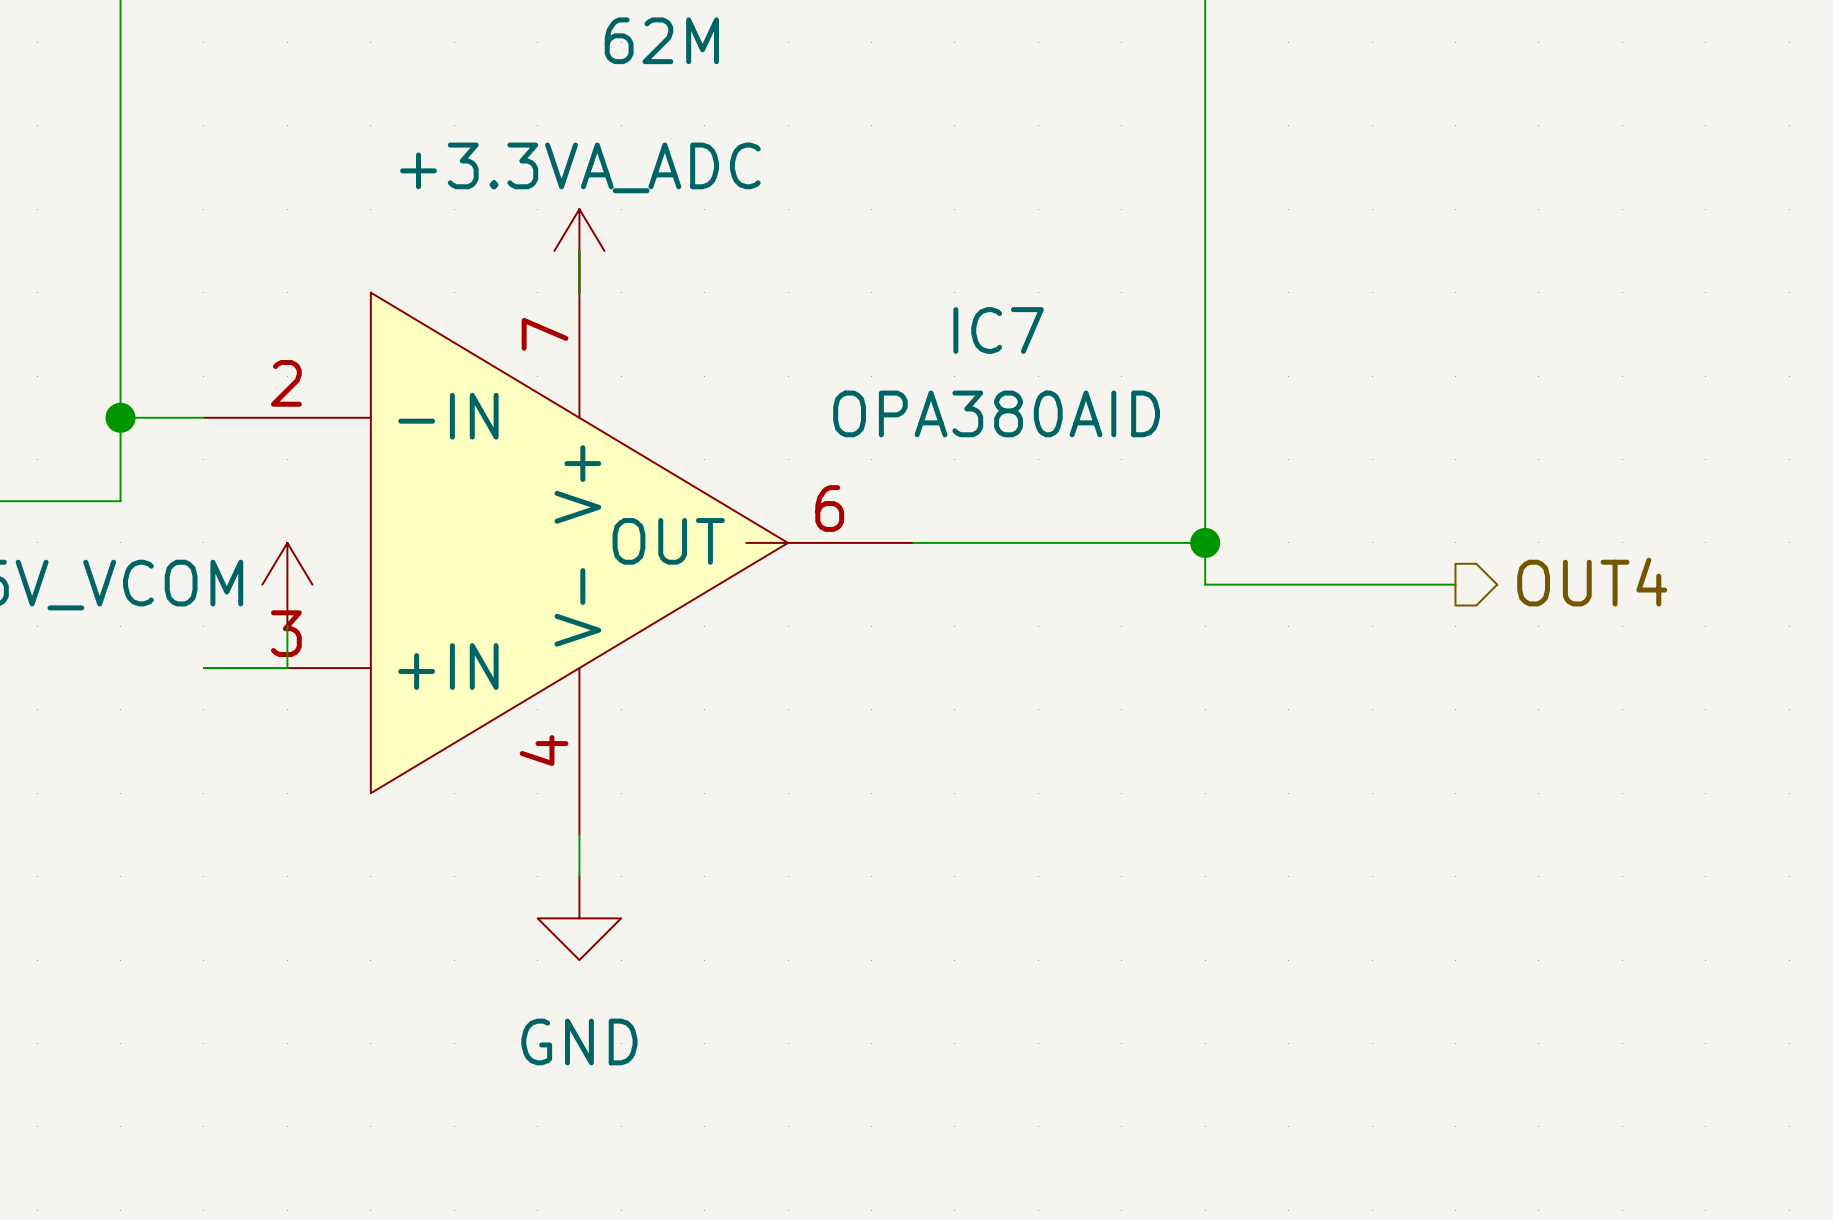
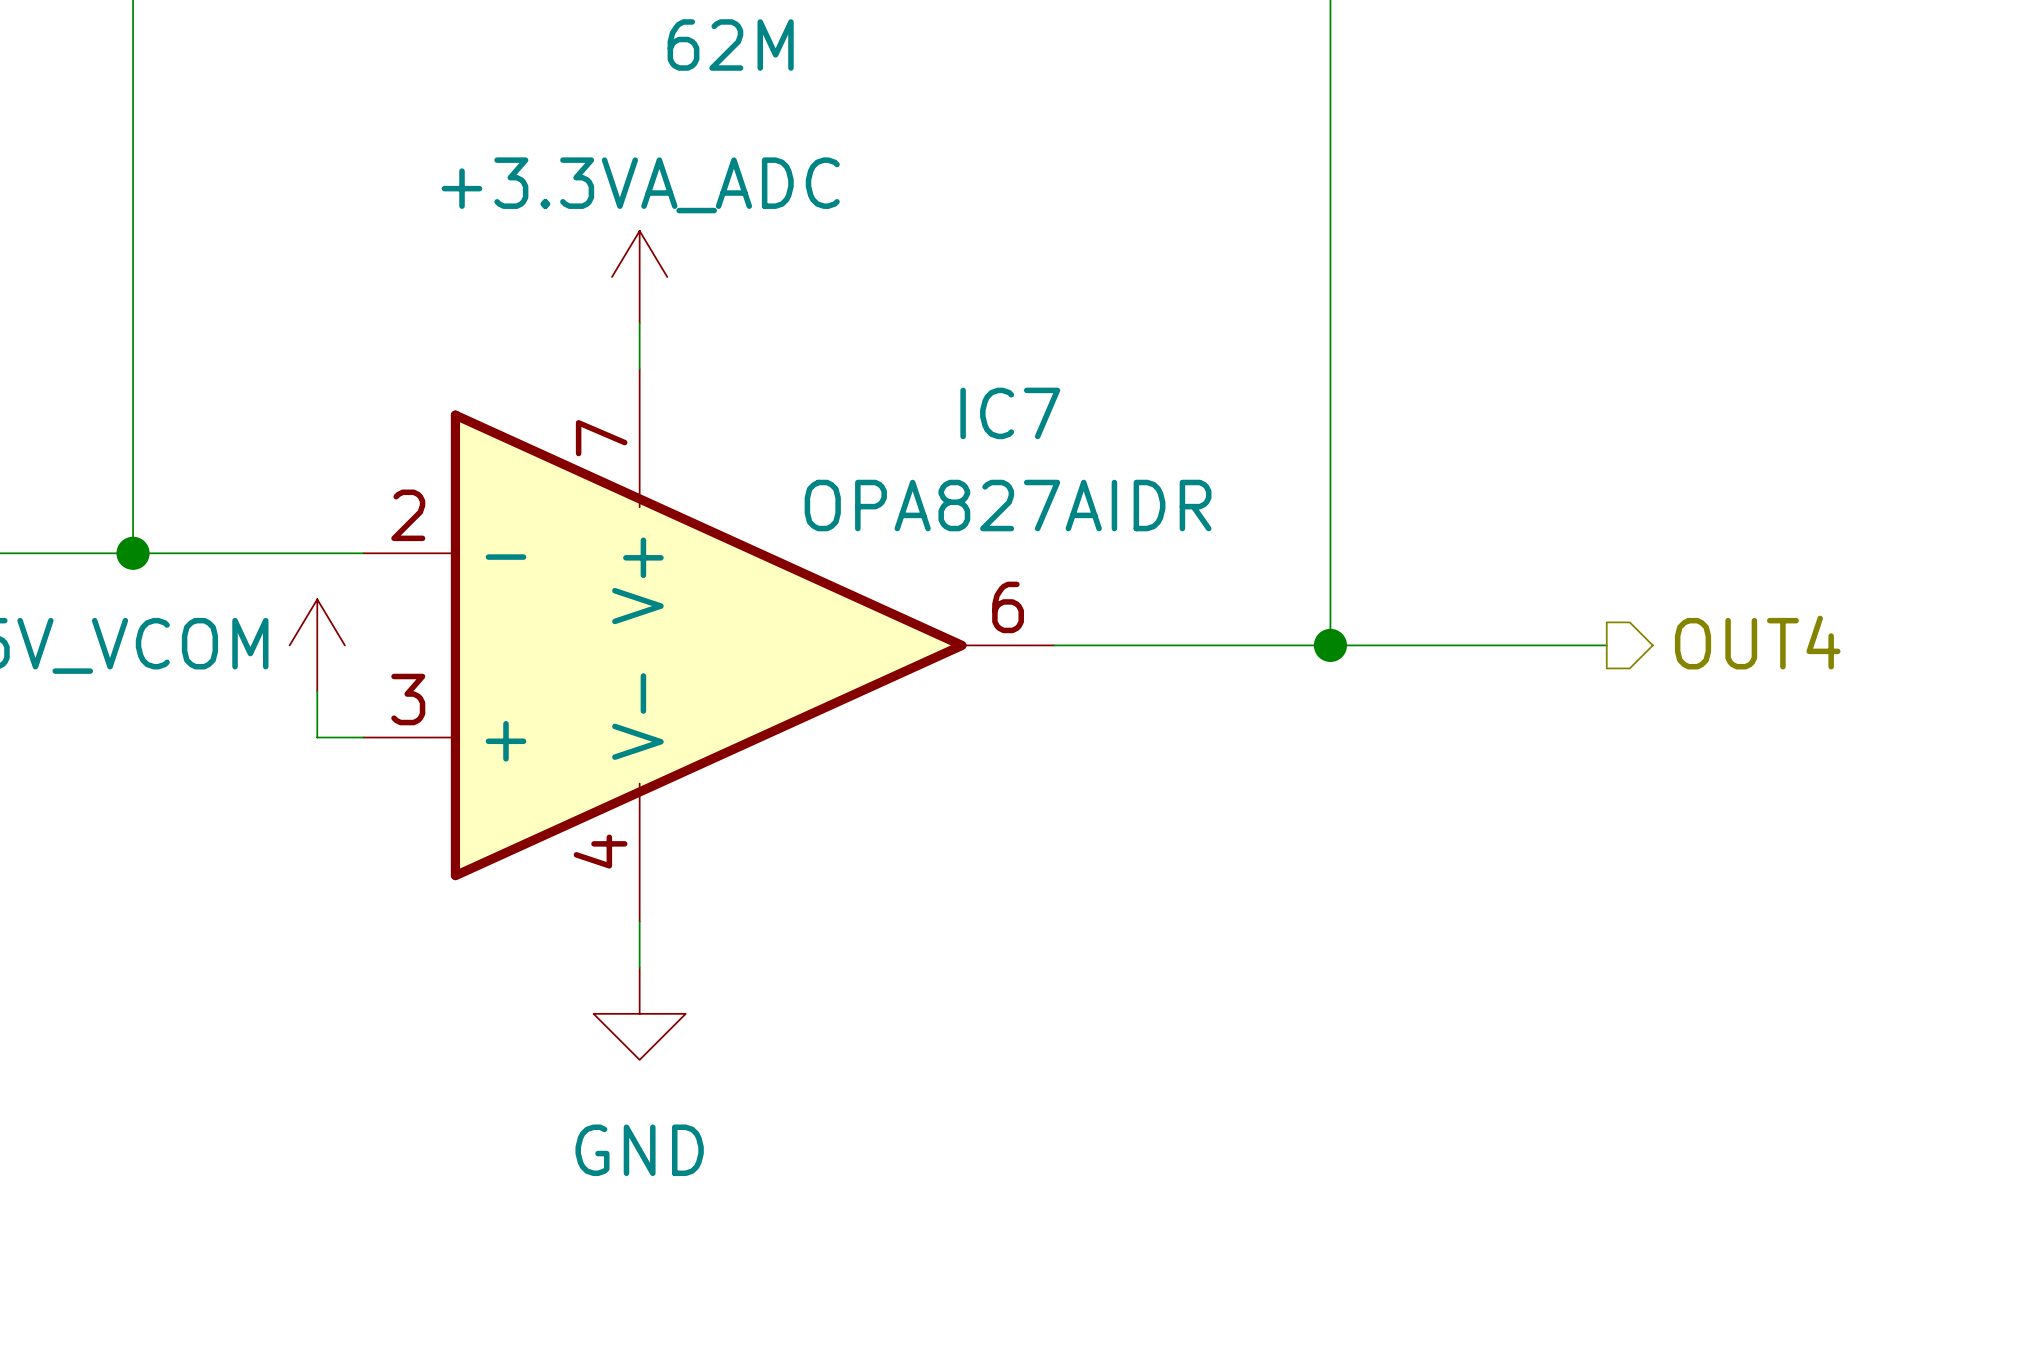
IC7 symbol: [203, 250, 914, 835] -> [363, 369, 1055, 922]
IC7 name position: IC7 (998, 330) -> IC7 (1010, 413)
IC7 value: OPA380AID (996, 413) -> OPA827AIDR (1008, 505)
wire: (120, 417) (203, 417) -> none
junction position: (120, 417) -> (133, 553)
wire: none -> (133, 553) (363, 553)
wire: (913, 542) (1205, 542) -> none
junction position: (1205, 542) -> (1330, 645)
wire: none -> (1054, 645) (1330, 645)

